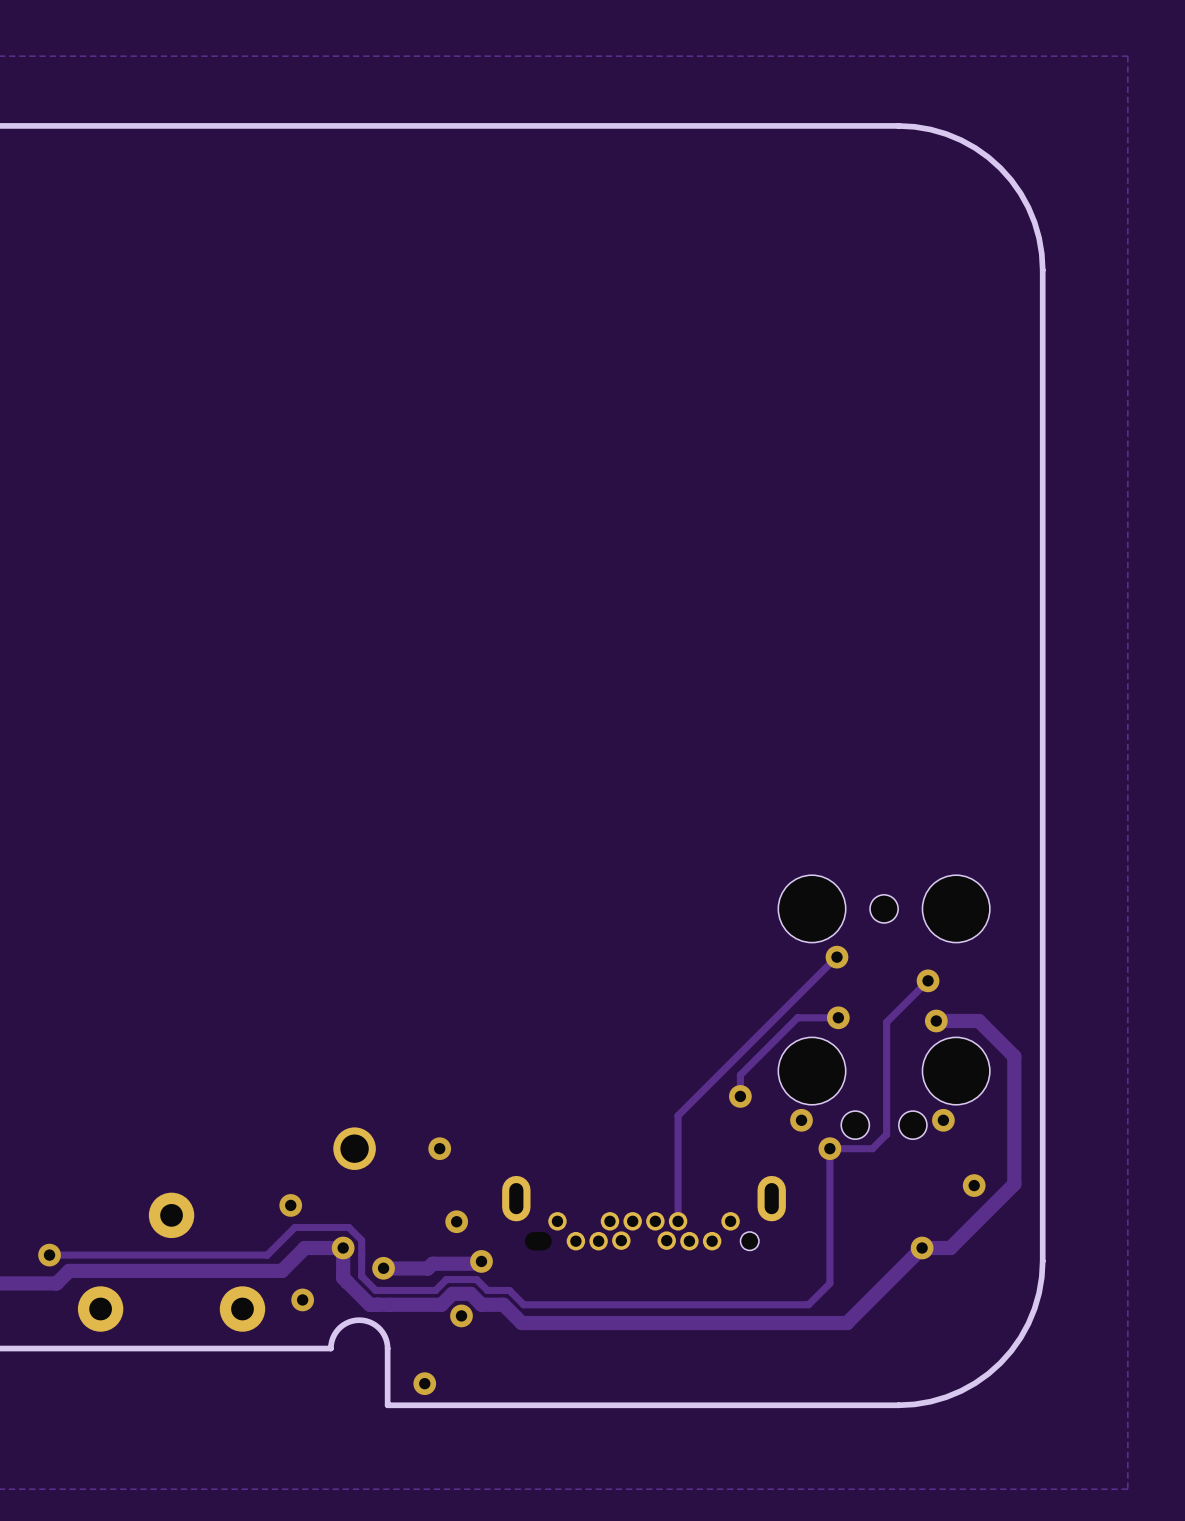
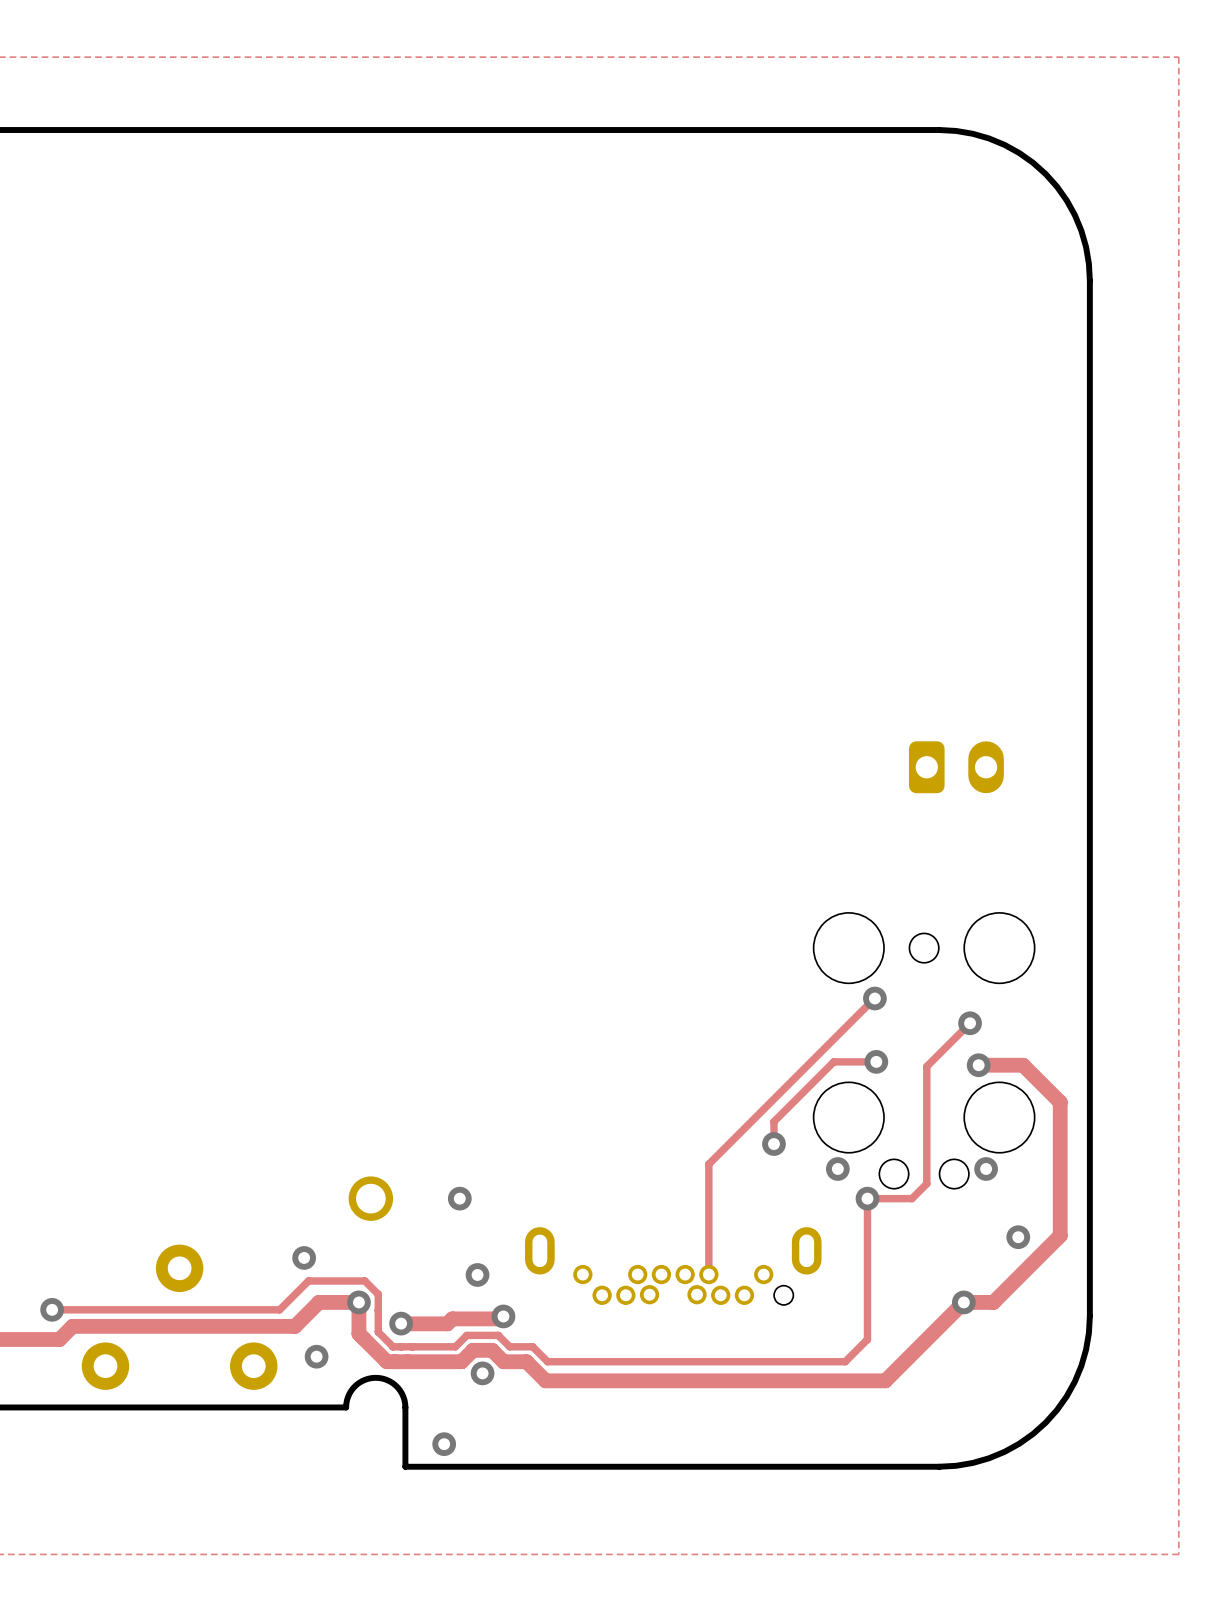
part: none -> (956, 767)

